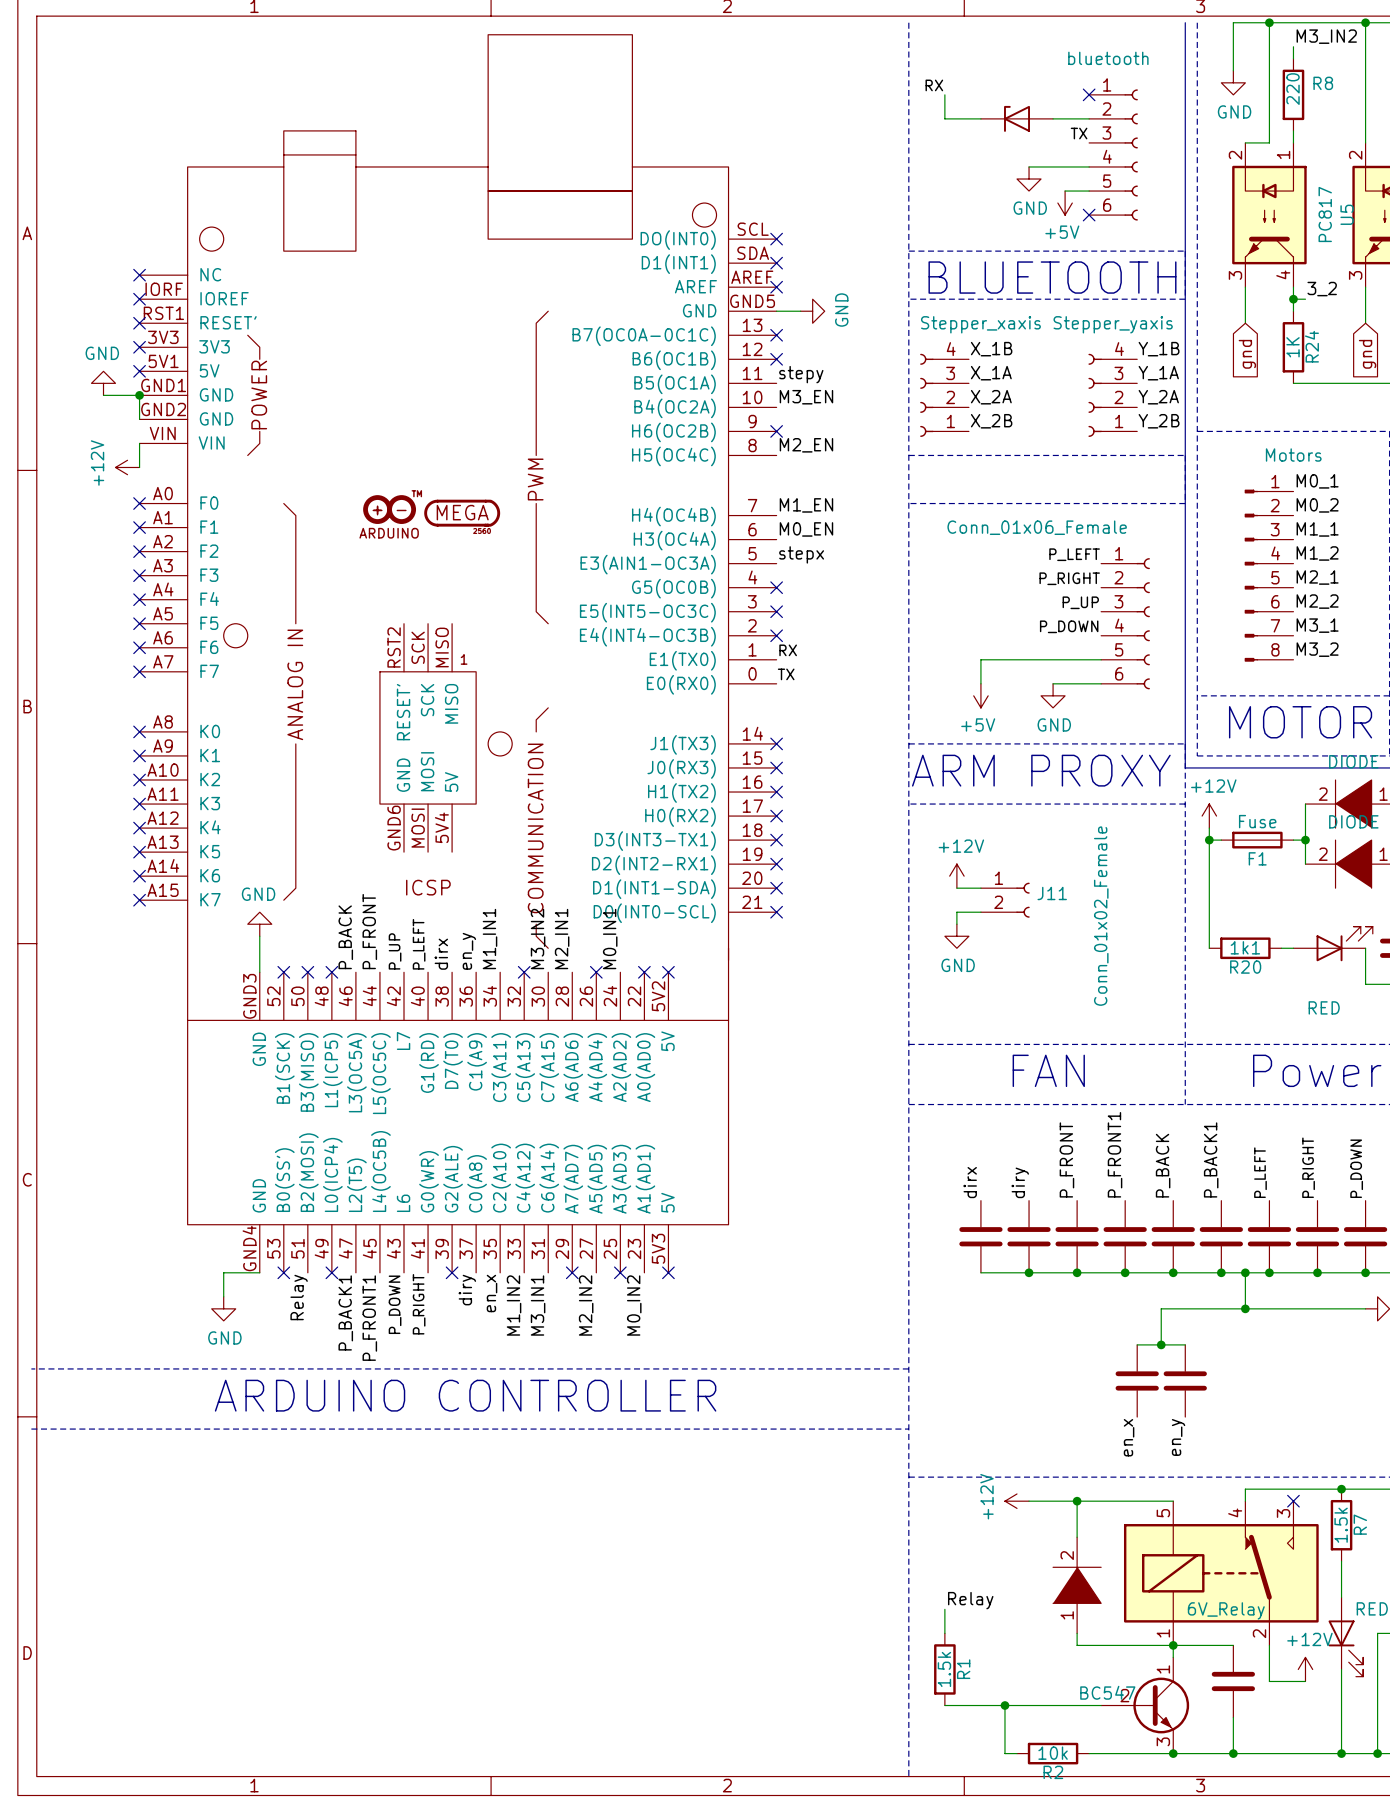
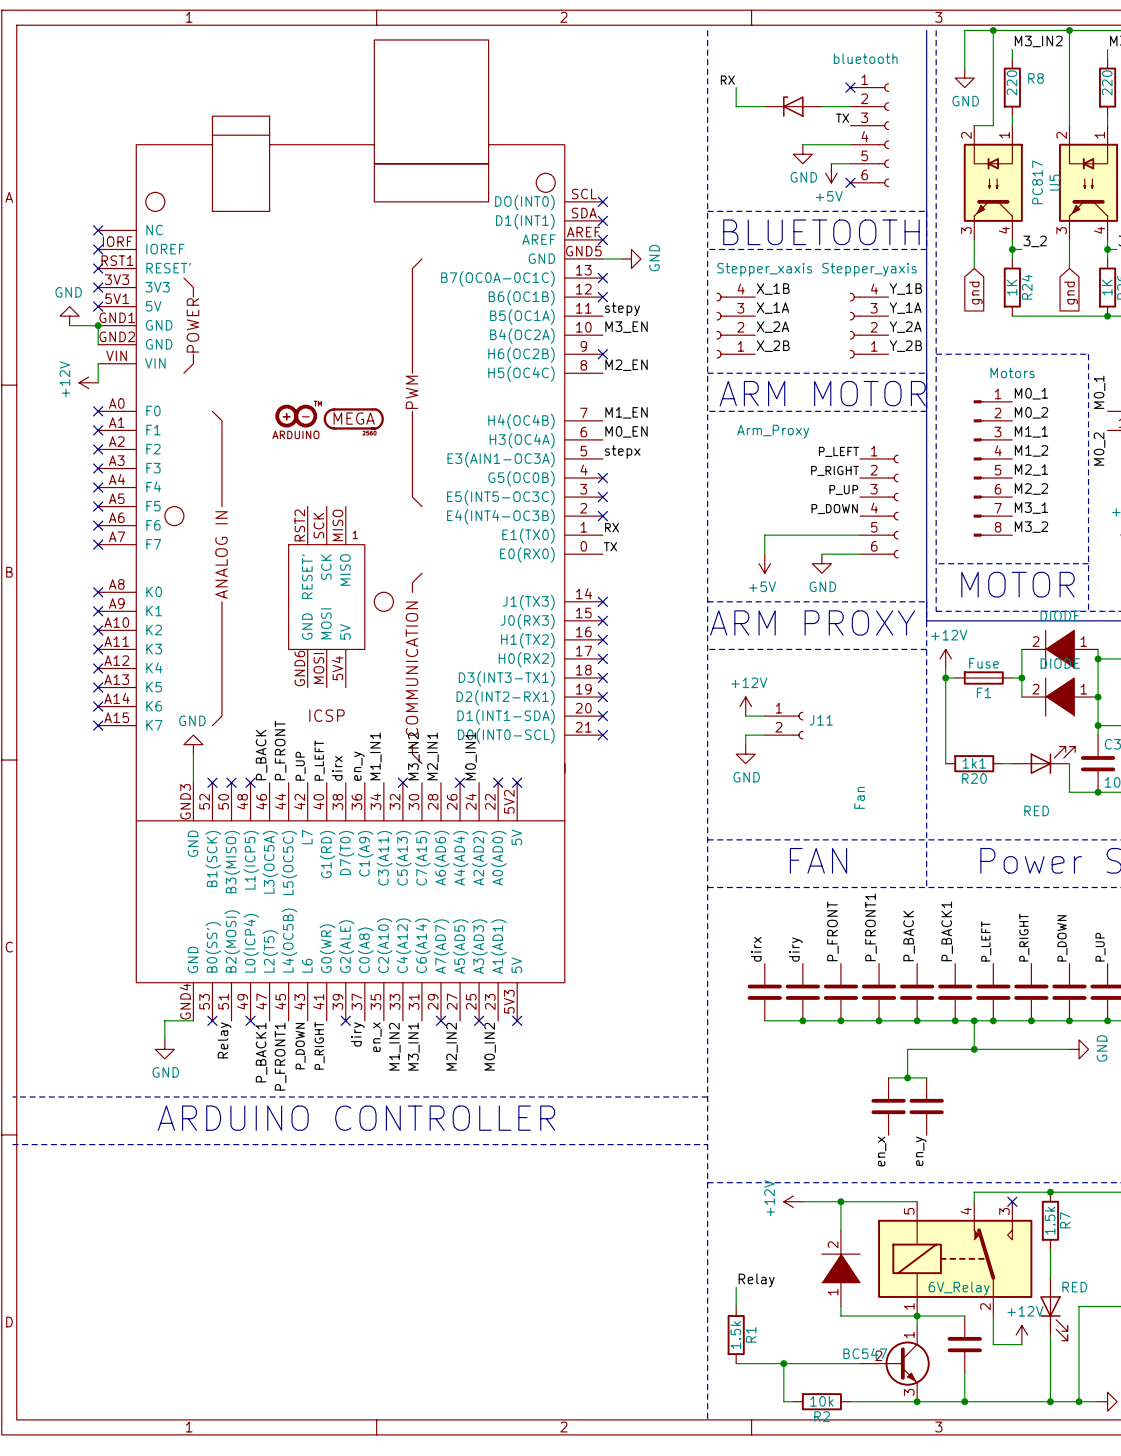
text: none -> ARM MOTOR (822, 393)
part value: Conn_01x06_Female (1037, 527) -> Arm_Proxy (773, 431)
J11 value: Conn_01x02_Female (1101, 916) -> Fan (859, 797)

